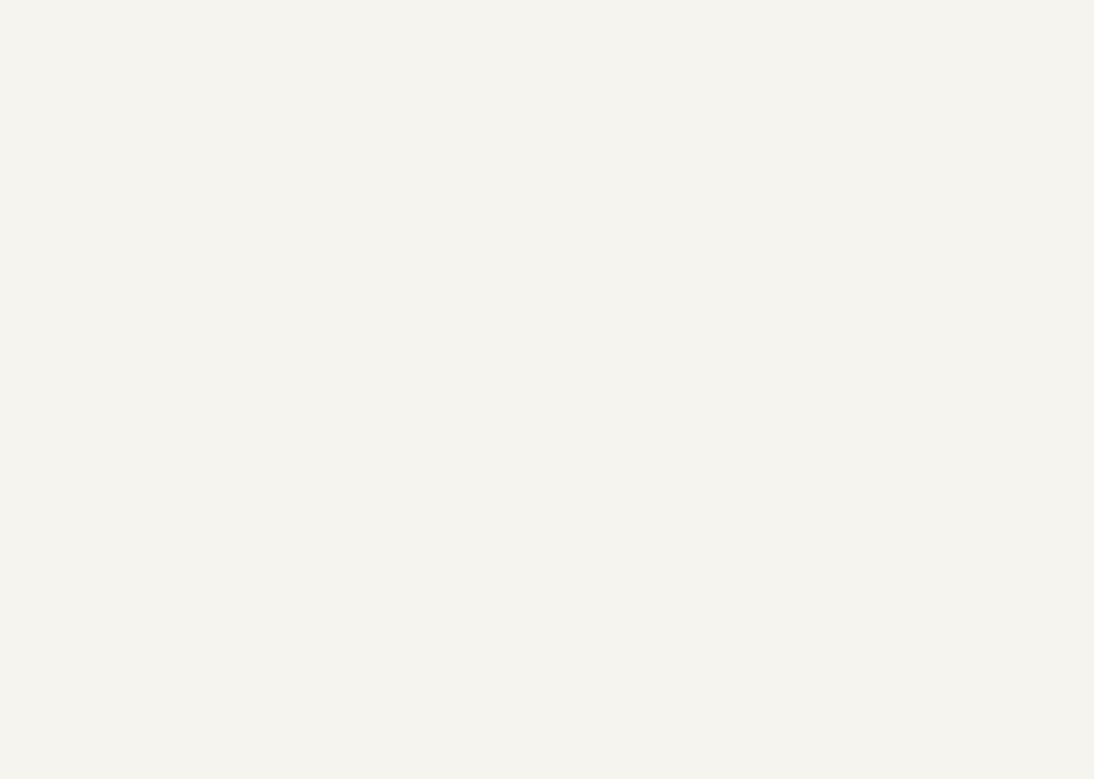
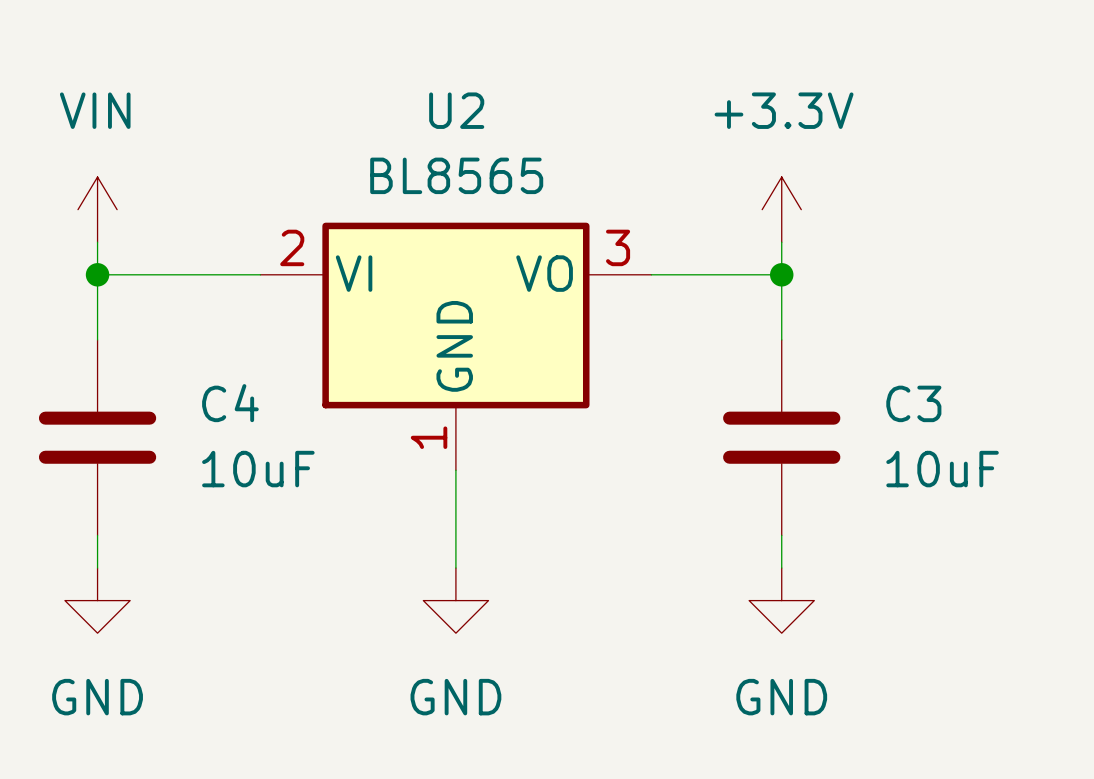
power symbol: none -> VIN (97, 209)
power symbol: none -> +3.3V (781, 209)
wire: none -> (97, 242) (97, 339)
wire: none -> (781, 242) (781, 339)
wire: none -> (97, 274) (260, 274)
junction: none -> (97, 274)
wire: none -> (651, 274) (781, 274)
junction: none -> (781, 274)
U2: none -> BL8565 (455, 346)
C4: none -> 10uF (97, 437)
C3: none -> 10uF (781, 437)
wire: none -> (455, 470) (455, 568)
wire: none -> (97, 535) (97, 568)
wire: none -> (781, 535) (781, 568)
power symbol: none -> GND (97, 600)
power symbol: none -> GND (455, 600)
power symbol: none -> GND (781, 600)

